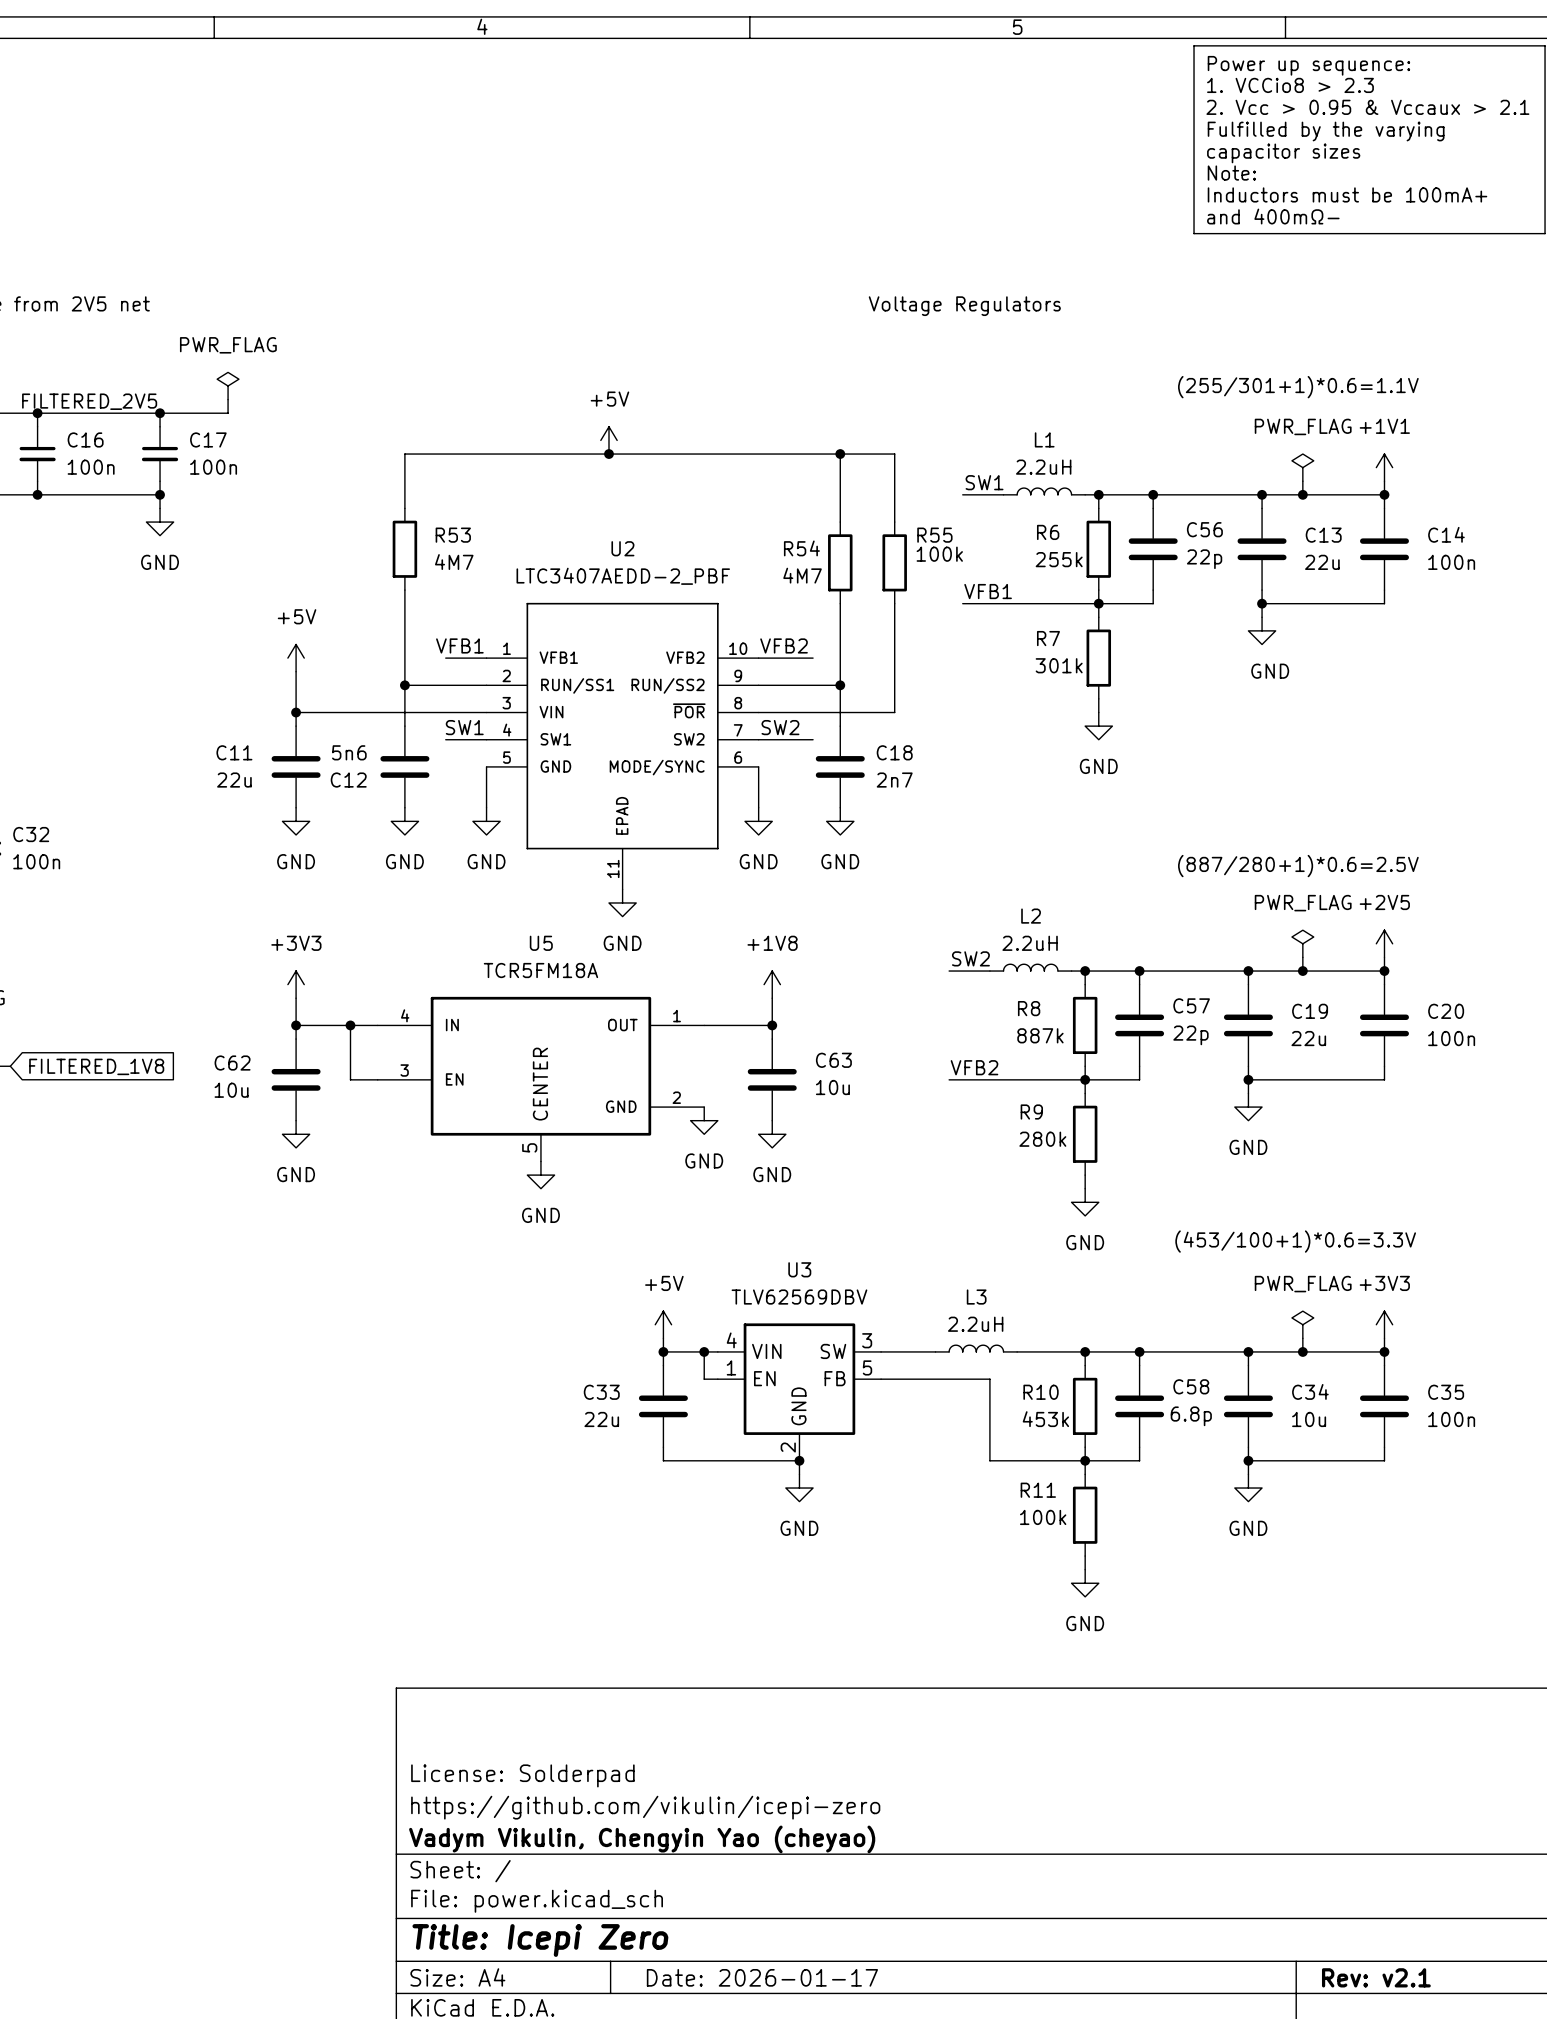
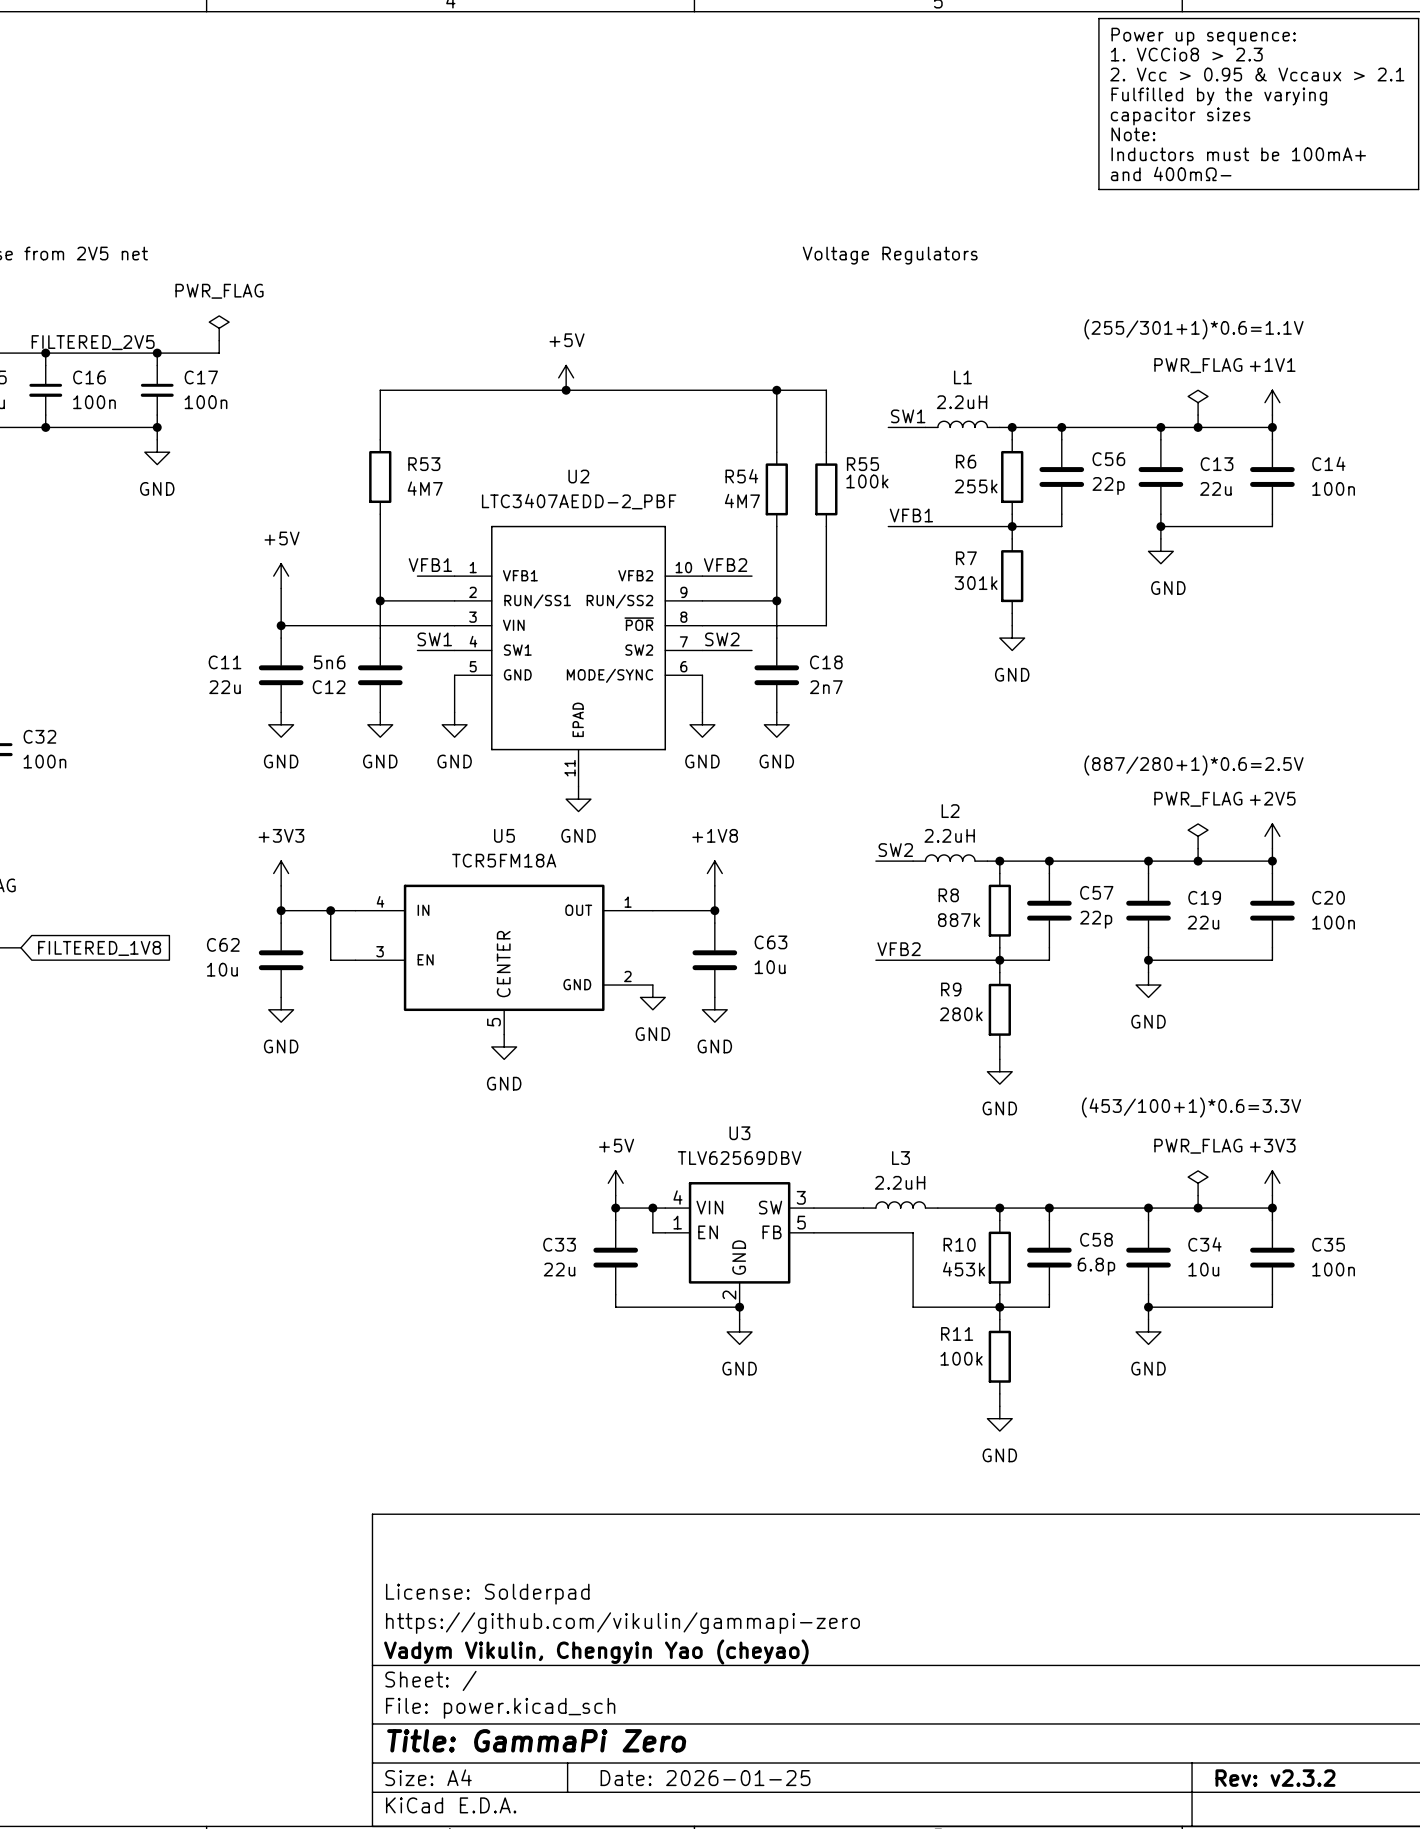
title block: https://github.com/vikulin/icepi-zero (645, 1807) -> https://github.com/vikulin/gammapi-zero (622, 1623)
title block: Title: Icepi Zero (540, 1940) -> Title: GammaPi Zero (536, 1740)
title block: Date: 2026-01-17 (762, 1977) -> Date: 2026-01-25 (705, 1778)
title block: Rev: v2.1 (1376, 1977) -> Rev: v2.3.2 (1275, 1778)

